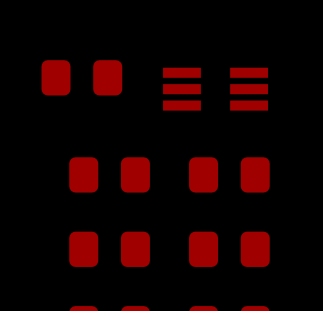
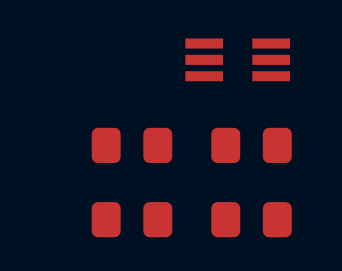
part: (81, 77) -> none

